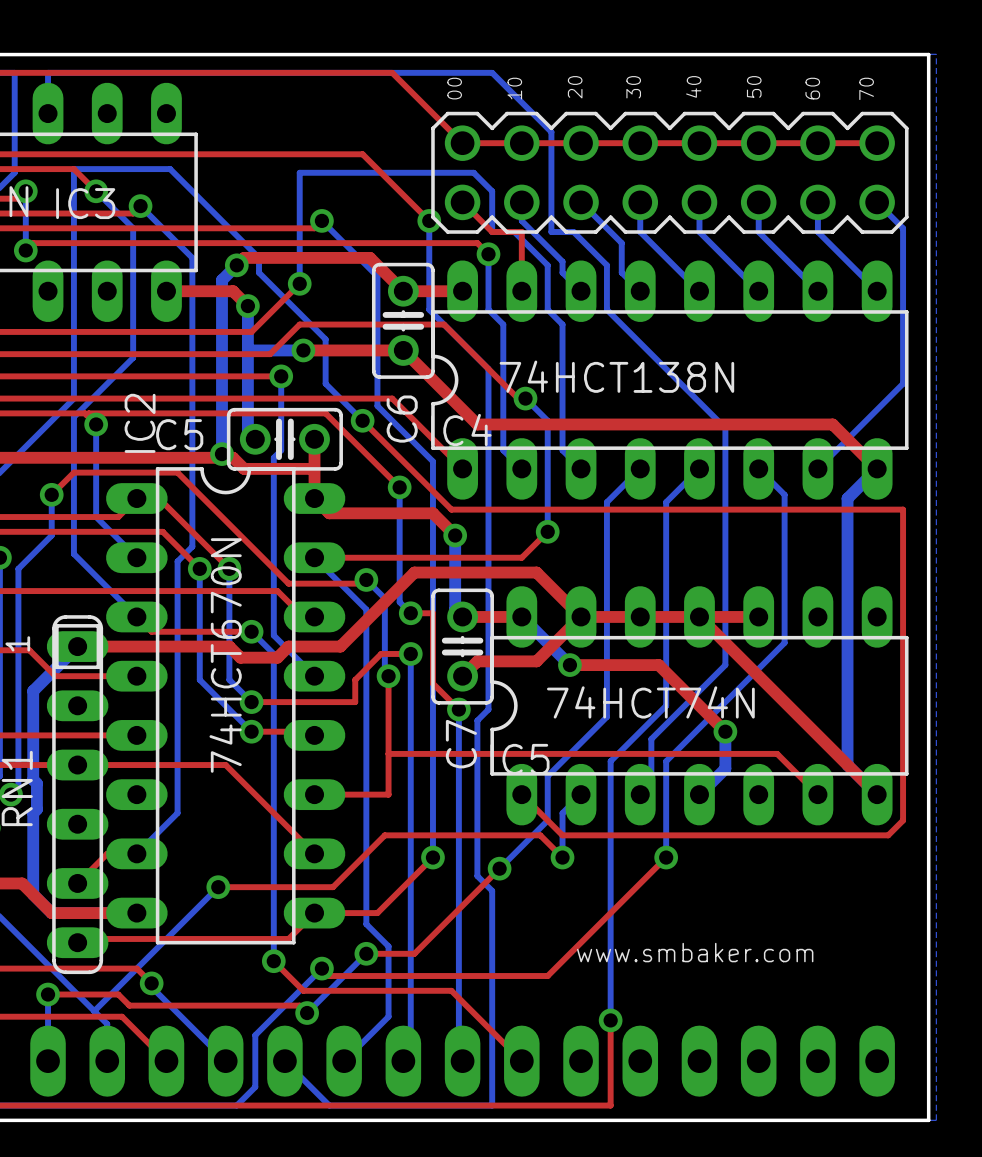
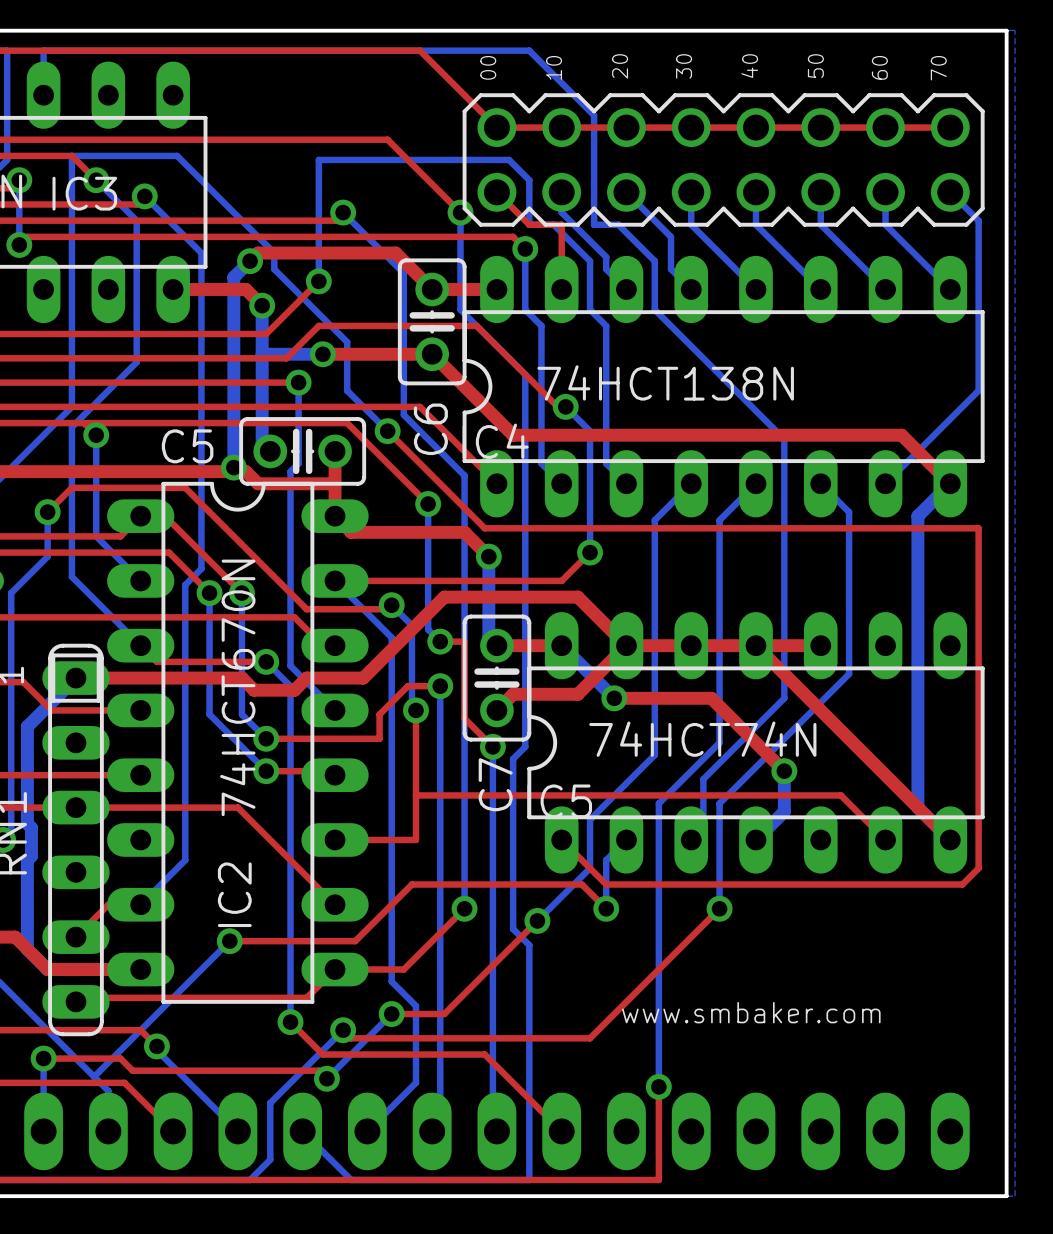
IC2 name position: IC2 (140, 423) -> IC2 (234, 894)

